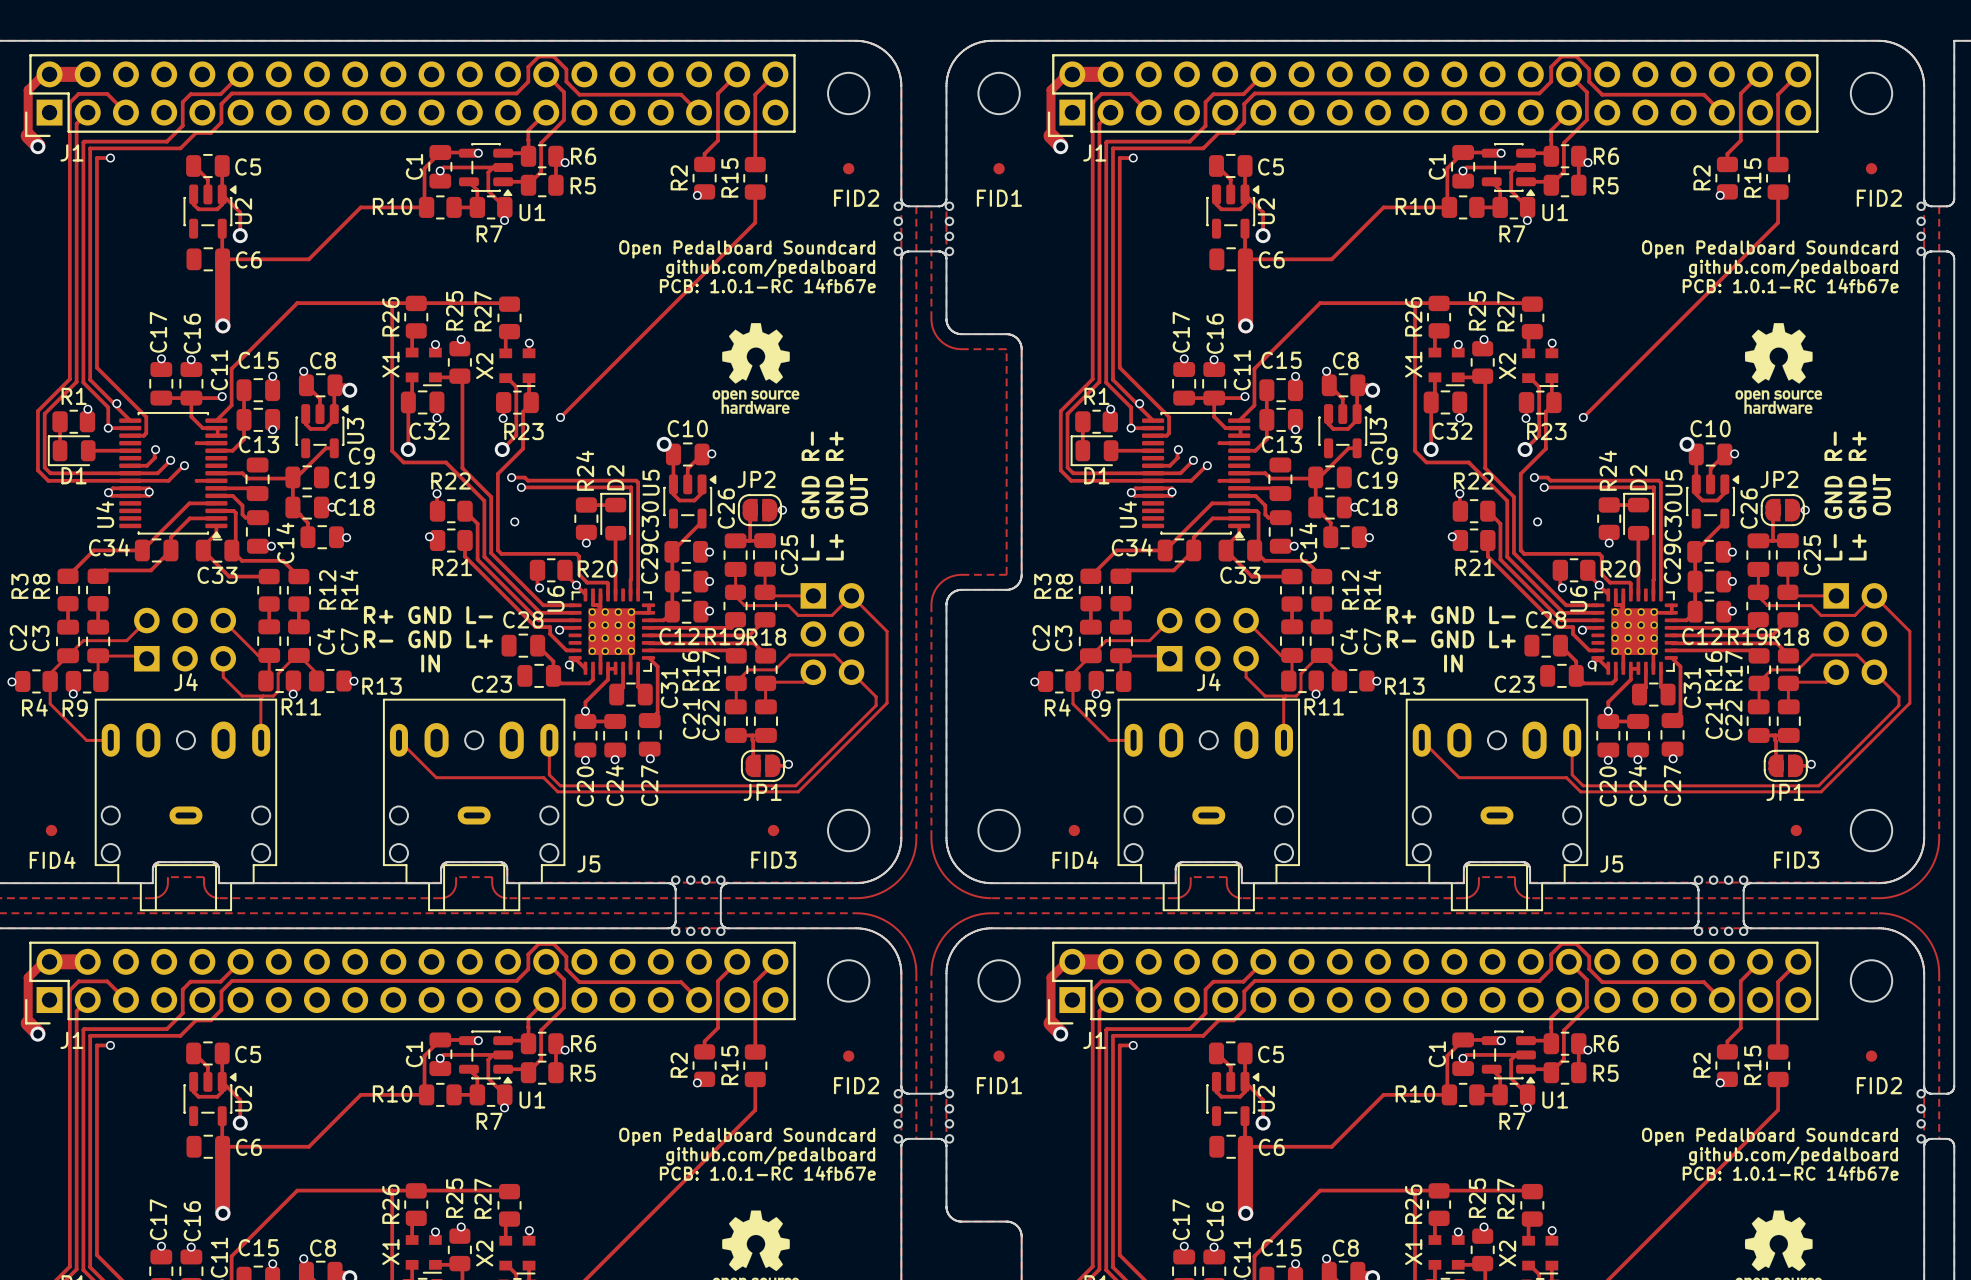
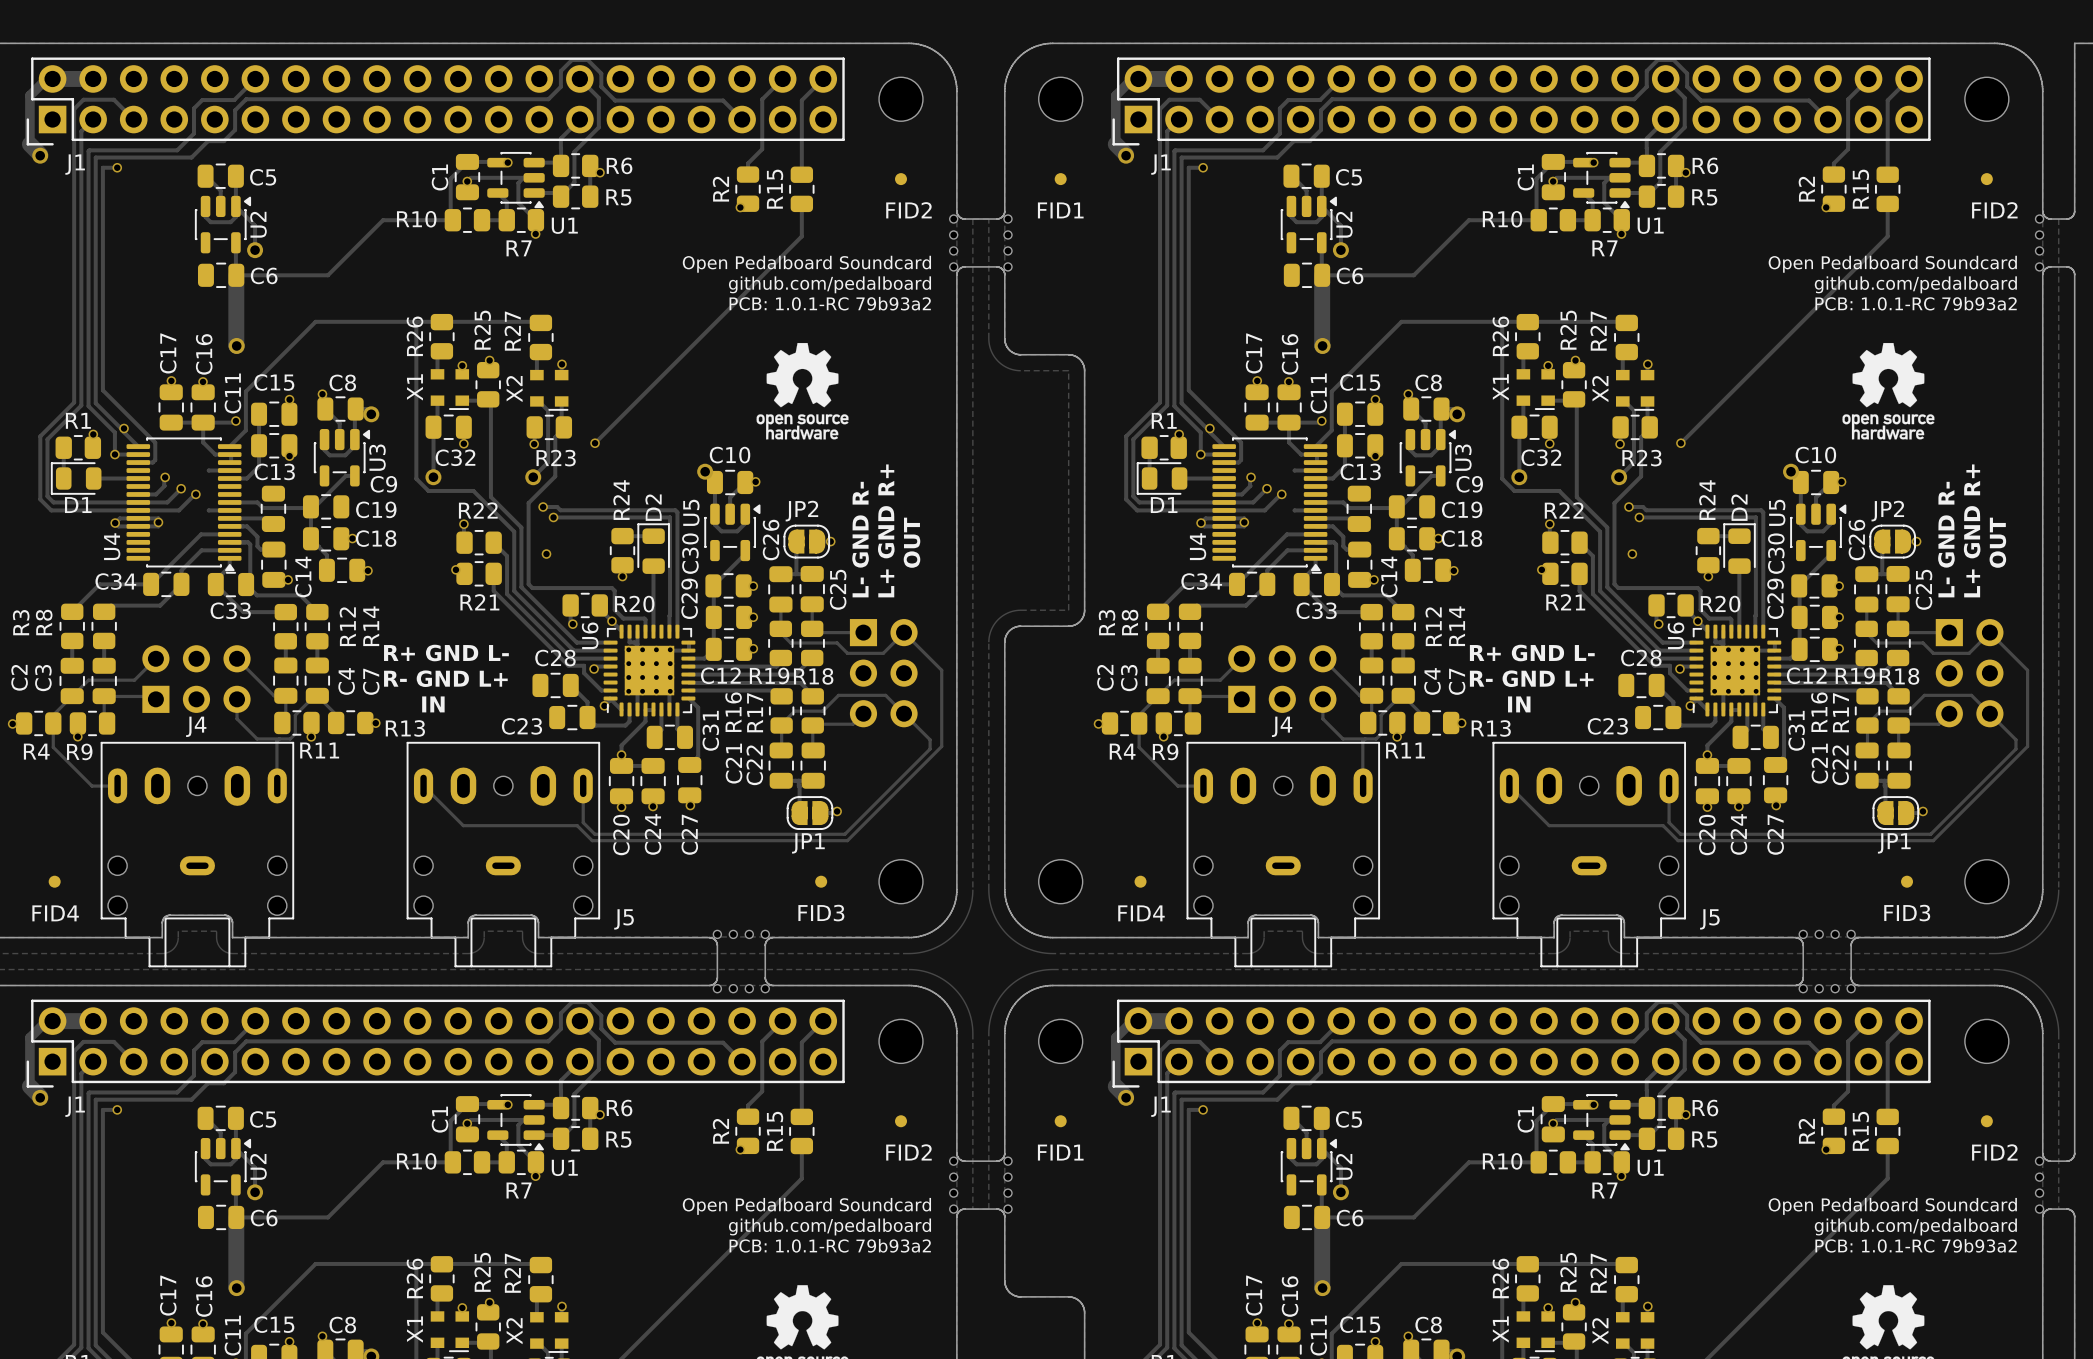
text: PCB: 1.0.1-RC 14fb67e (767, 285) -> PCB: 1.0.1-RC 79b93a2 (830, 303)
text: PCB: 1.0.1-RC 14fb67e (1790, 285) -> PCB: 1.0.1-RC 79b93a2 (1916, 303)
text: PCB: 1.0.1-RC 14fb67e (767, 1173) -> PCB: 1.0.1-RC 79b93a2 (830, 1245)
text: PCB: 1.0.1-RC 14fb67e (1790, 1173) -> PCB: 1.0.1-RC 79b93a2 (1916, 1245)

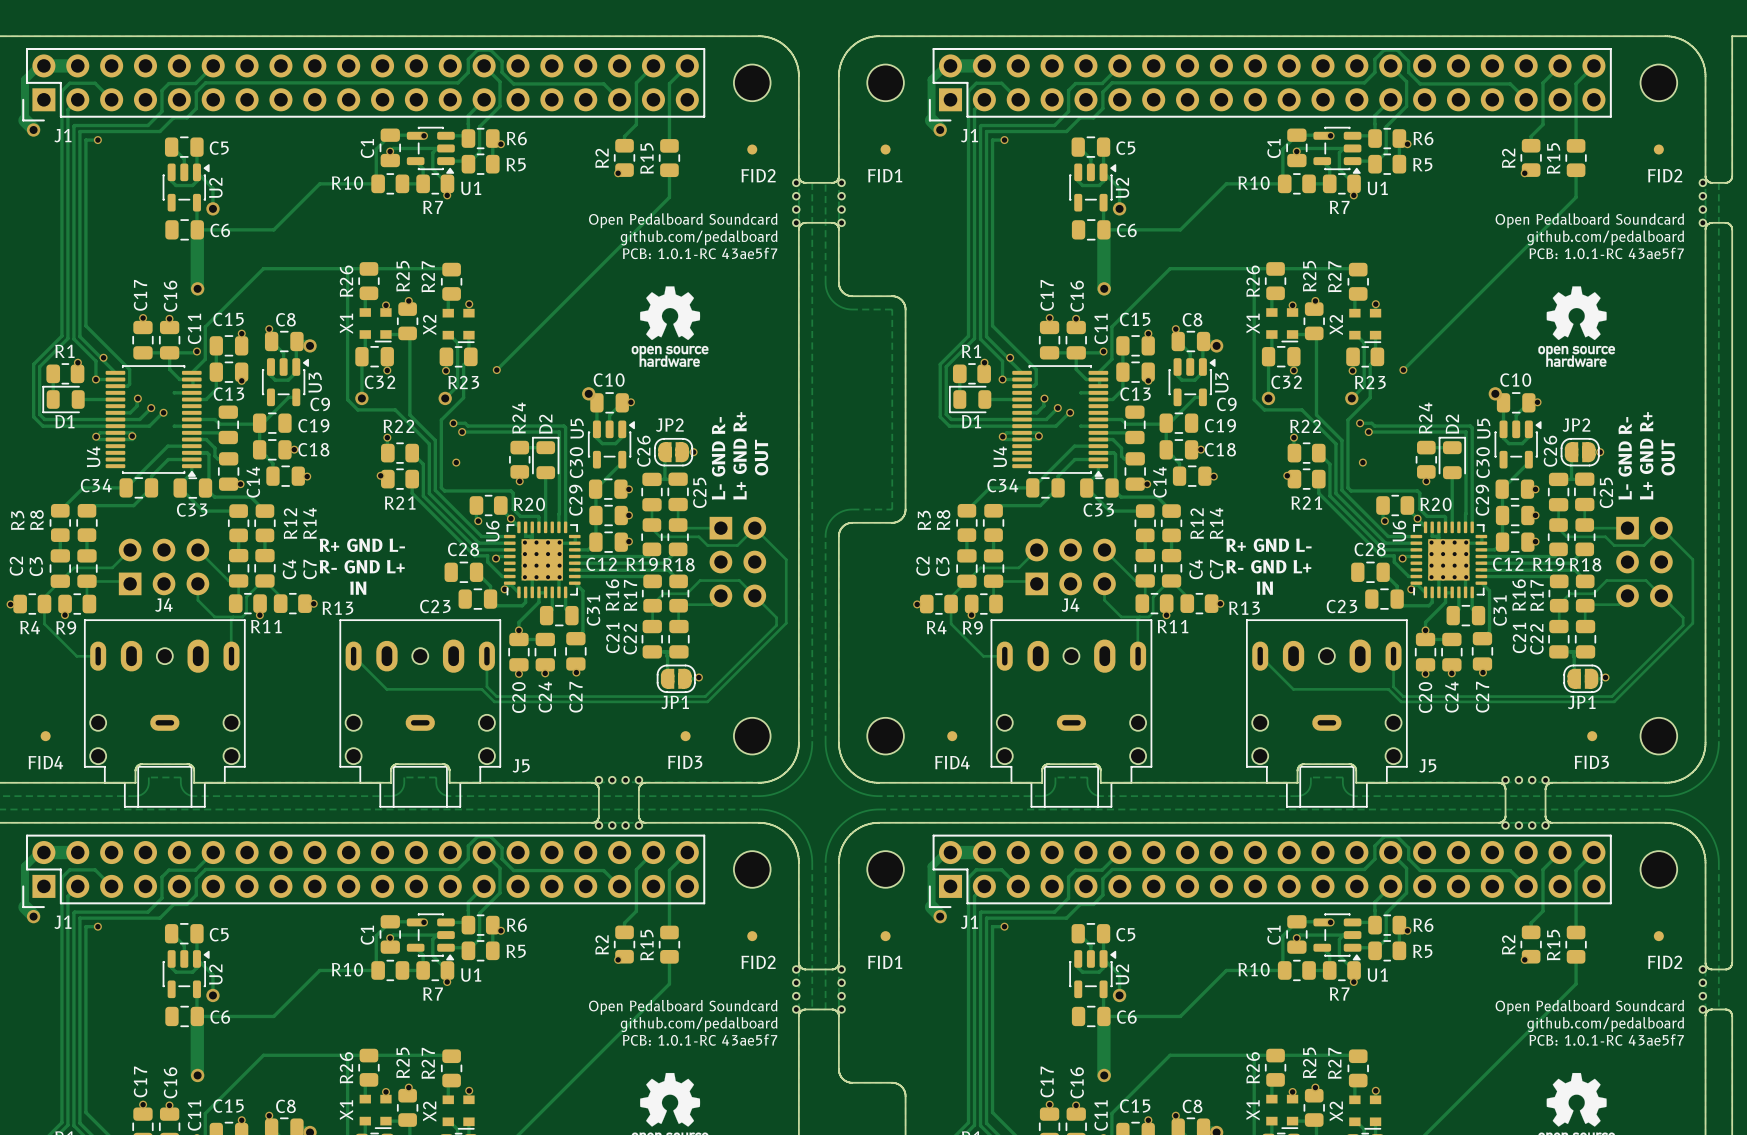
text: PCB: 1.0.1-RC 79b93a2 (830, 303) -> PCB: 1.0.1-RC 43ae5f7 (700, 253)
text: PCB: 1.0.1-RC 79b93a2 (1916, 303) -> PCB: 1.0.1-RC 43ae5f7 (1606, 253)
text: PCB: 1.0.1-RC 79b93a2 (830, 1245) -> PCB: 1.0.1-RC 43ae5f7 (700, 1040)
text: PCB: 1.0.1-RC 79b93a2 (1916, 1245) -> PCB: 1.0.1-RC 43ae5f7 (1606, 1040)

